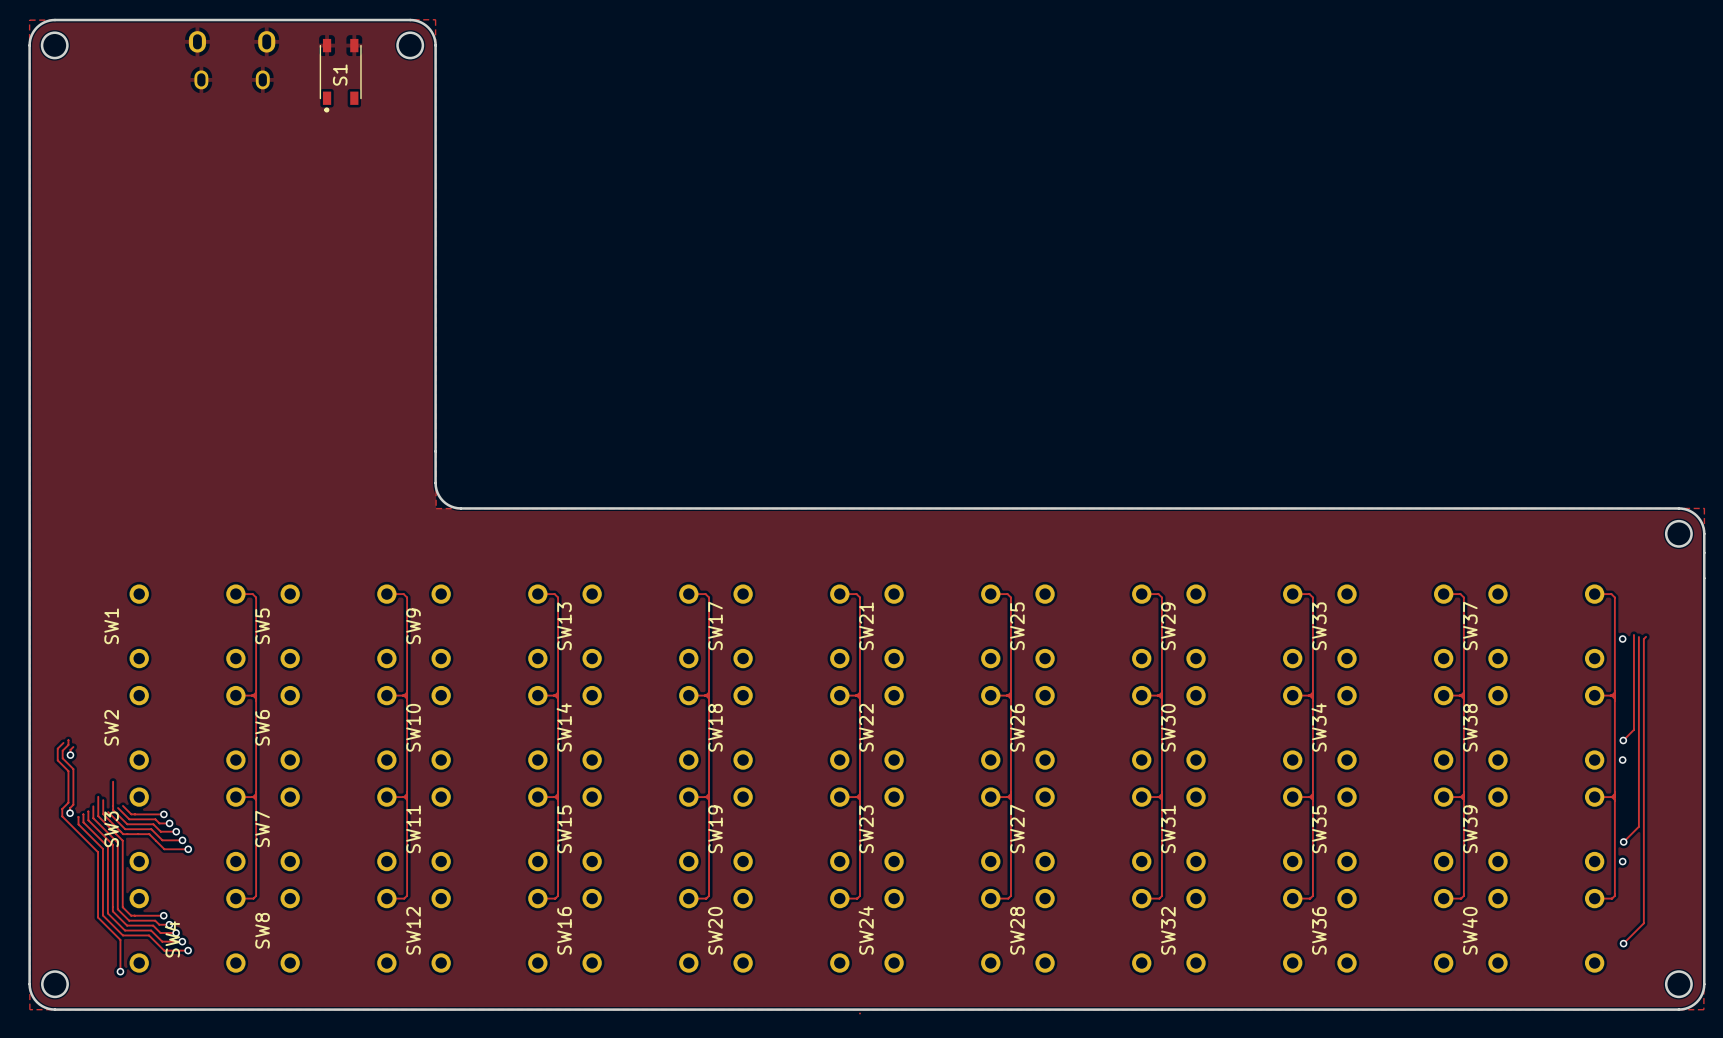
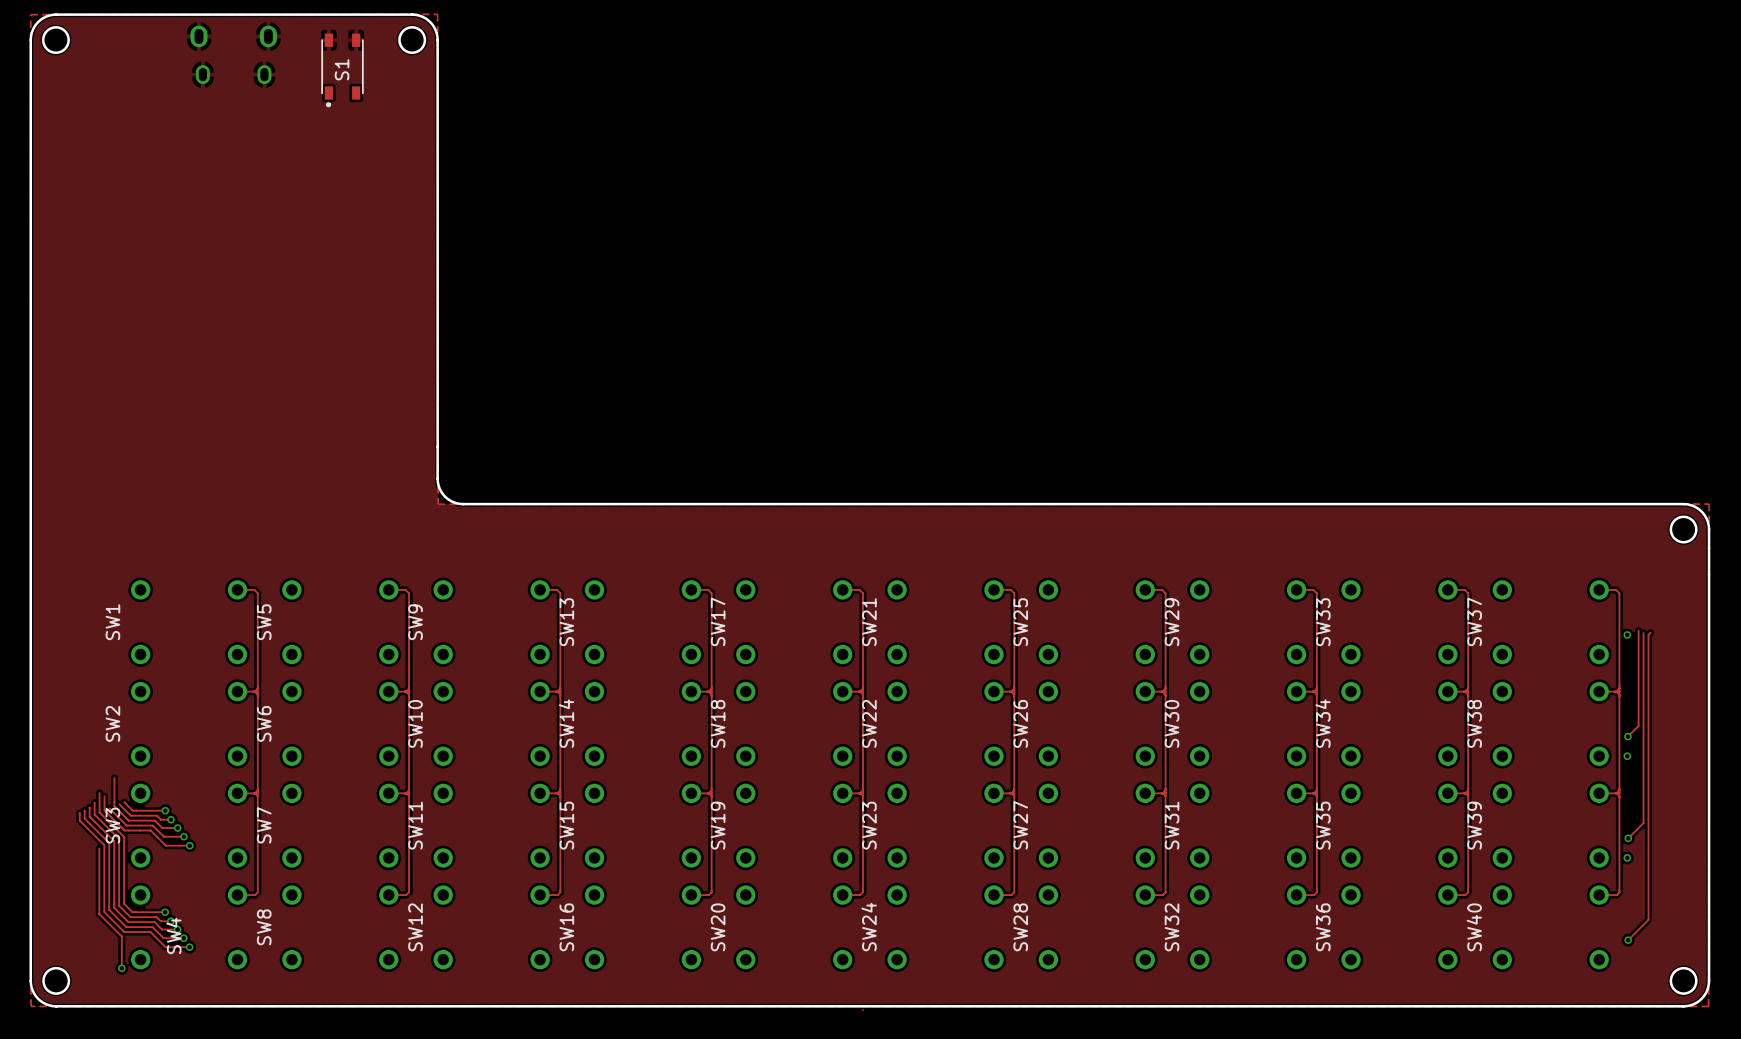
track: (68, 740) (68, 744) (62, 750) (62, 758) (73, 769) (73, 804) (70, 808) (70, 813) -> none
track: (63, 742) (57, 748) (57, 760) (68, 771) (68, 802) (62, 808) (62, 816) (98, 852) -> none
track: (73, 747) (70, 749) (70, 755) -> none
via: (70, 755) -> none
via: (70, 813) -> none

